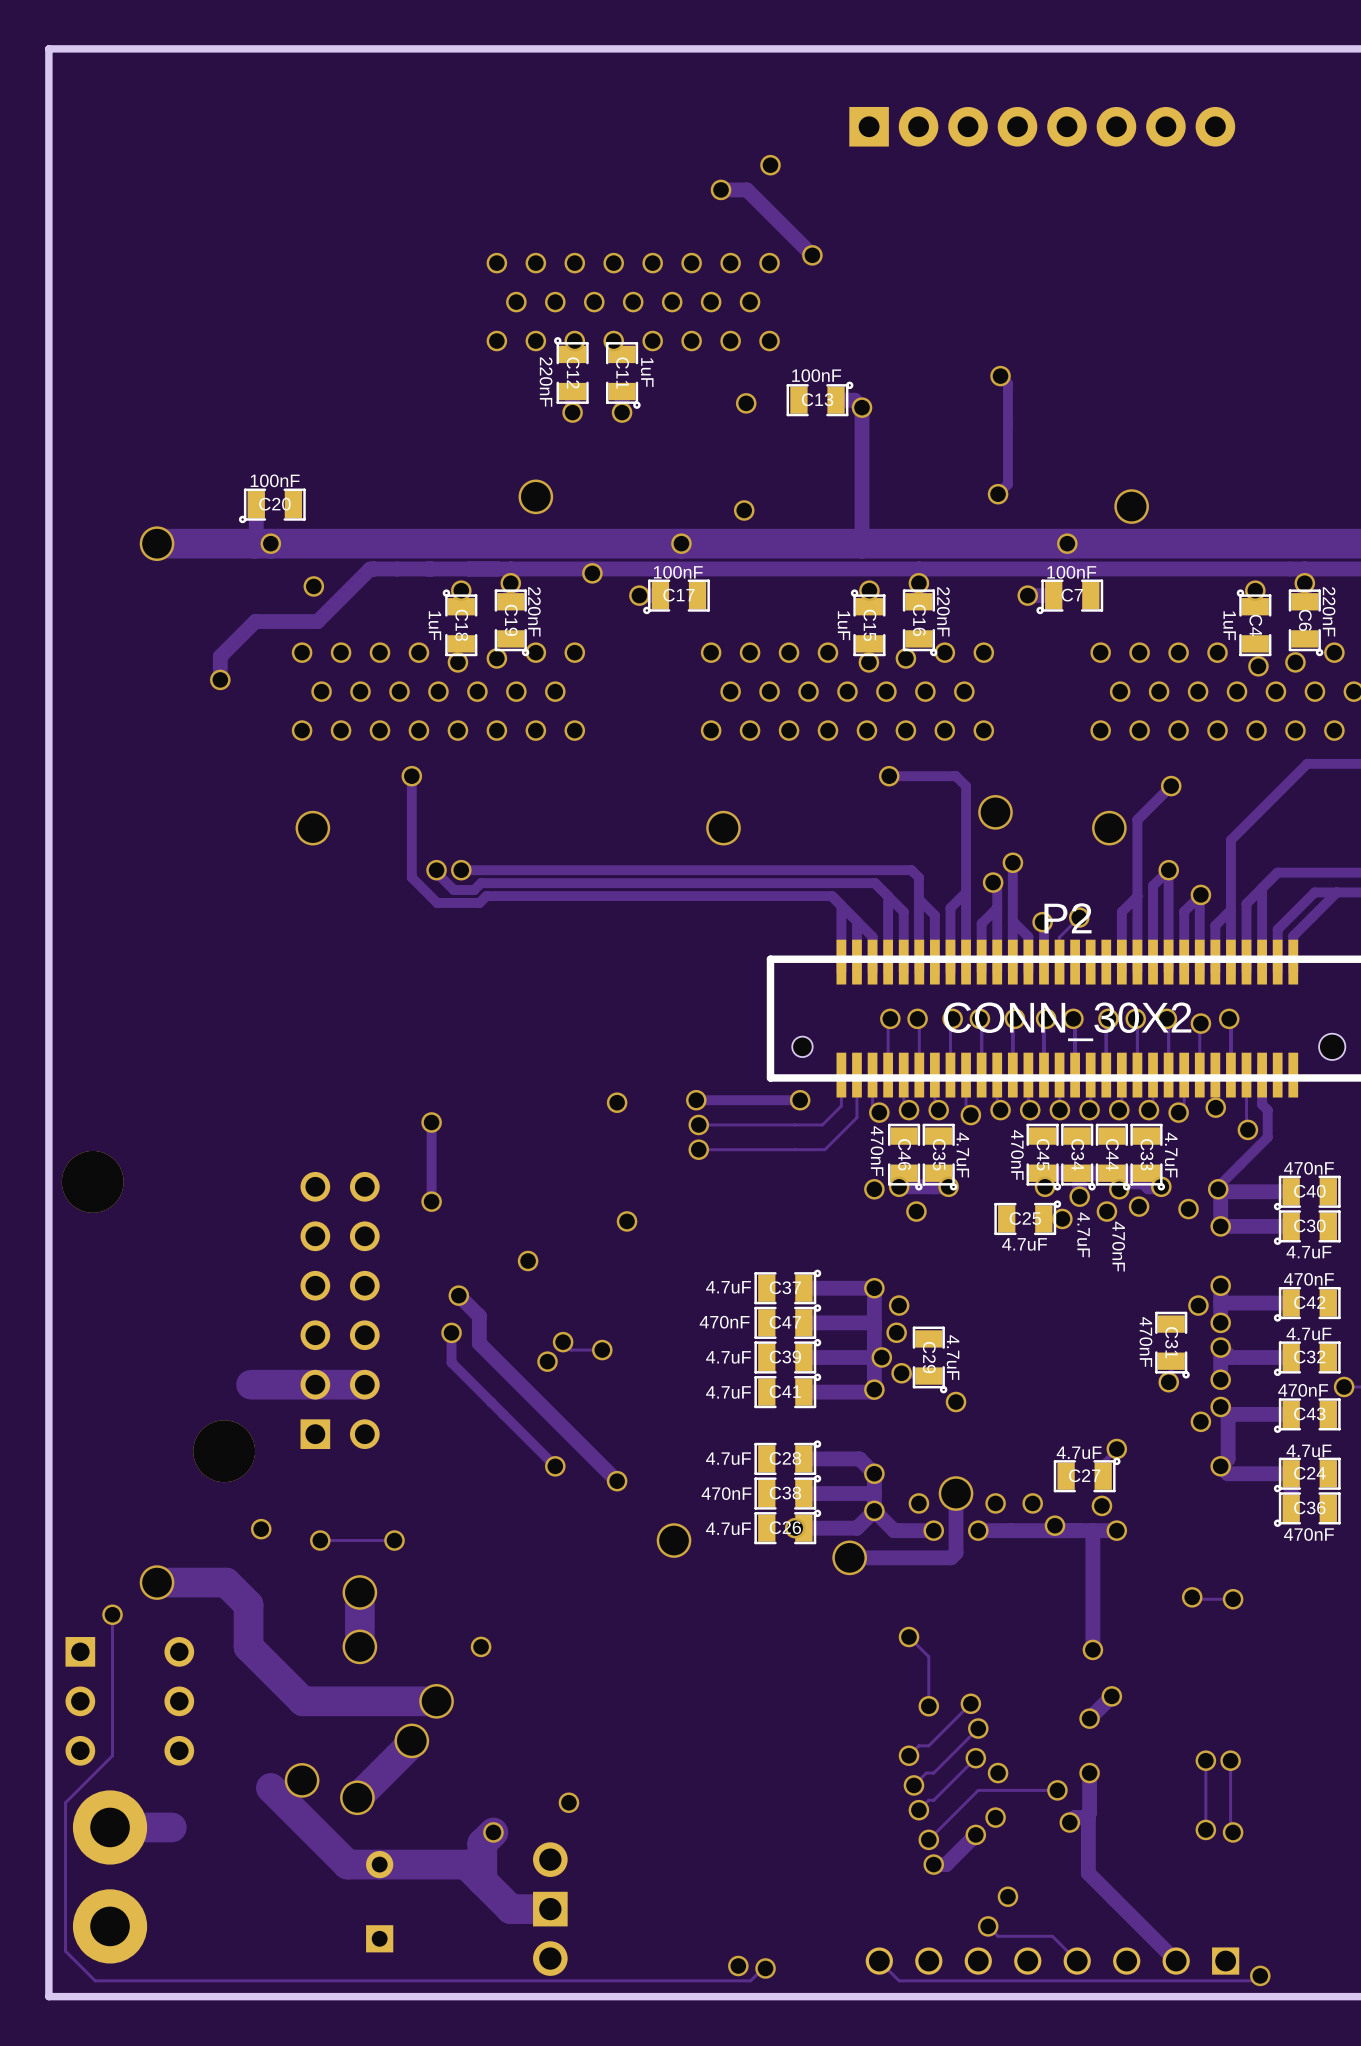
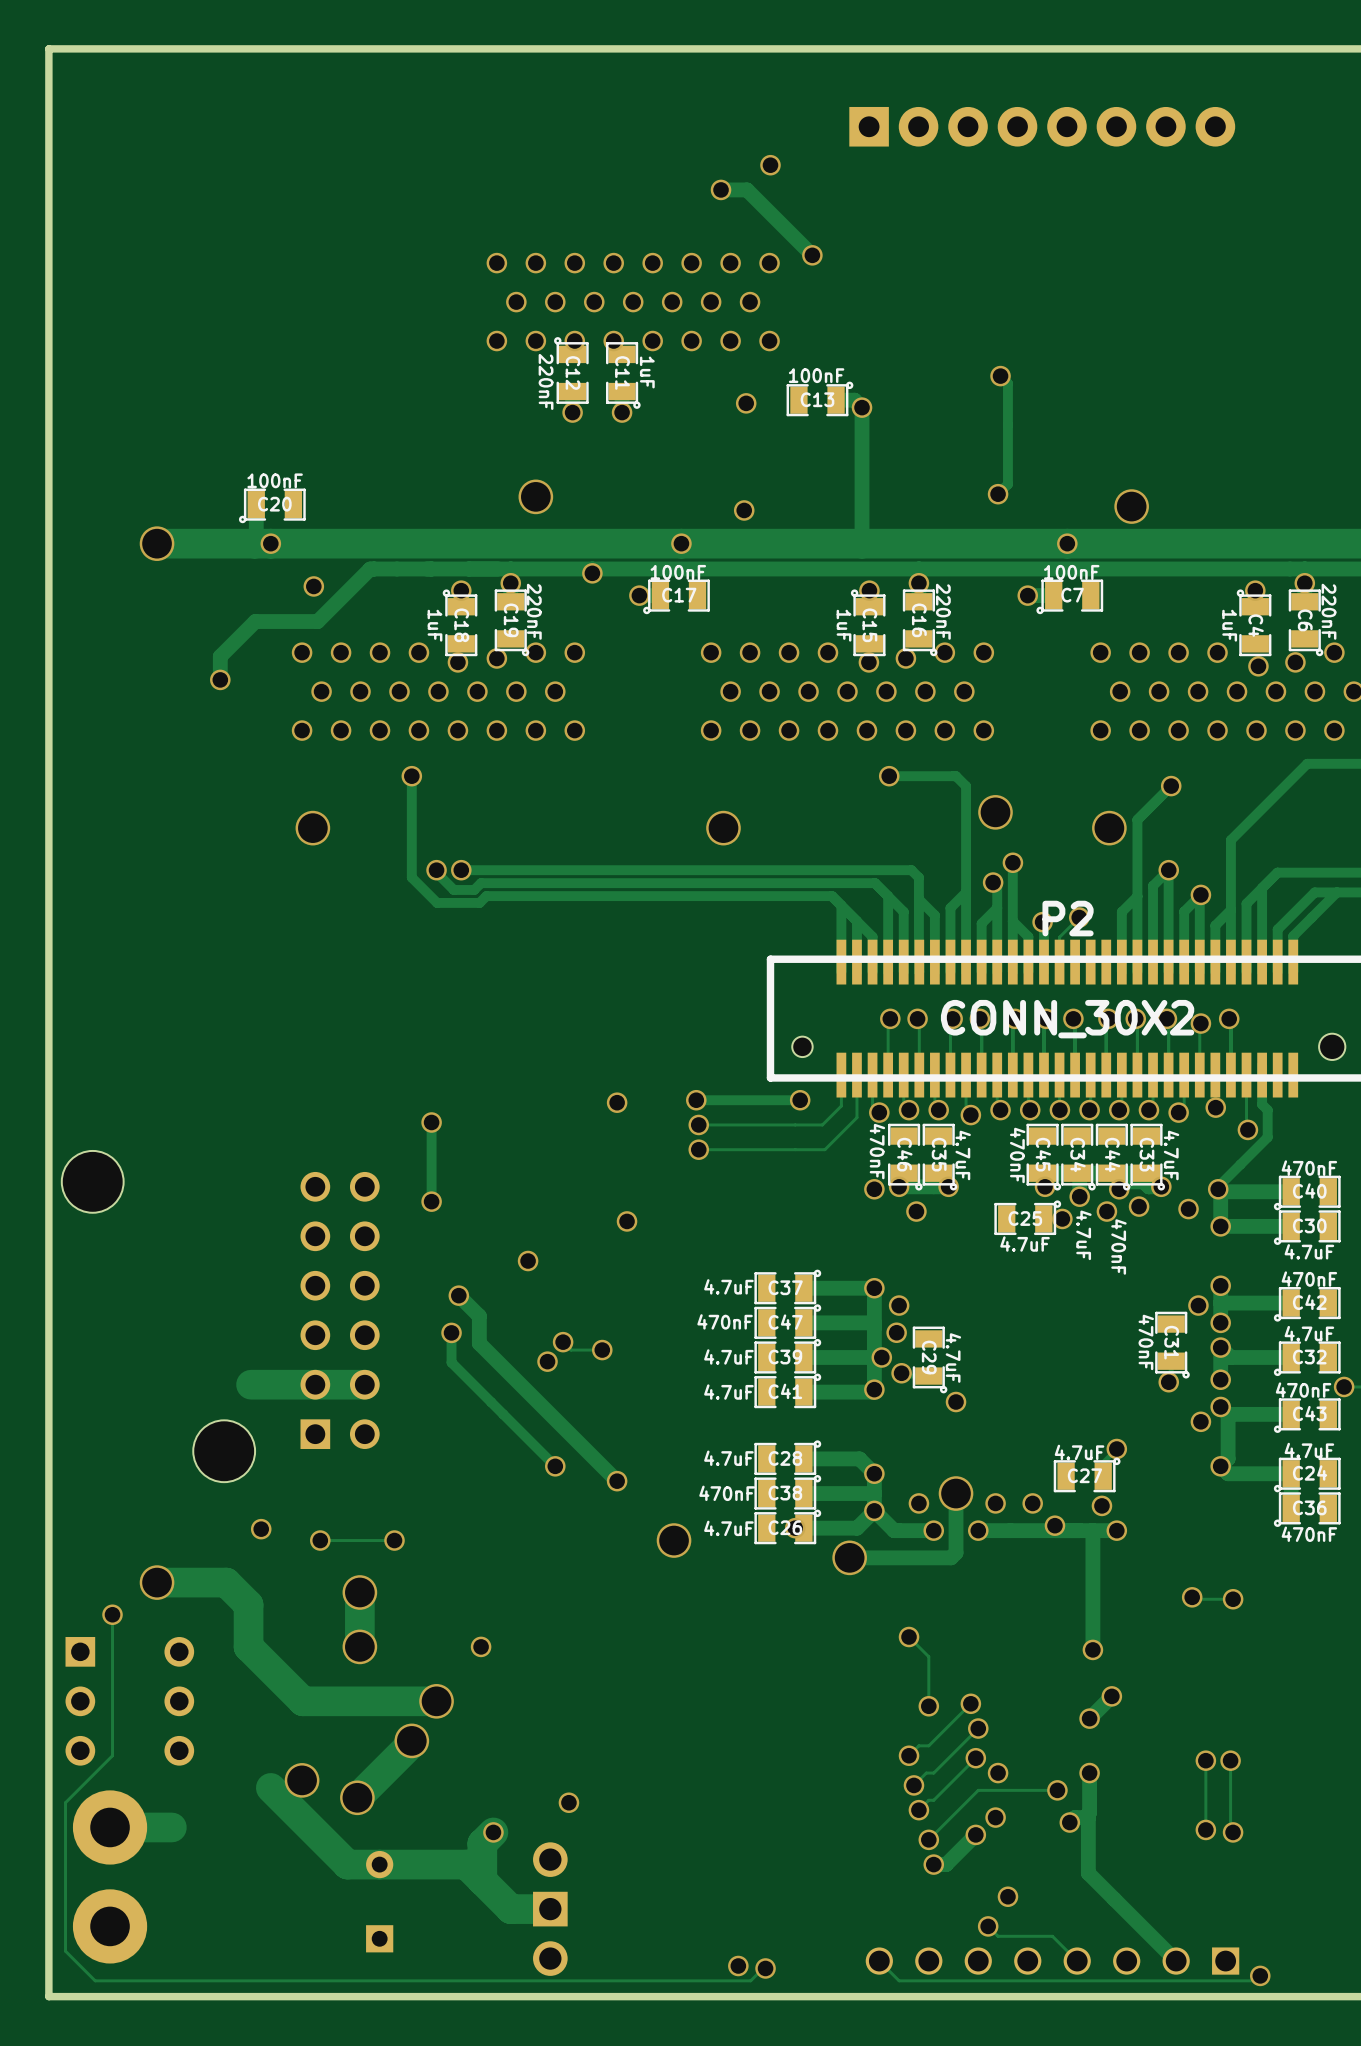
part footprint: [61, 1150, 124, 1213] -> [61, 1150, 124, 1213]
part footprint: [193, 1420, 256, 1483] -> [193, 1420, 256, 1483]

